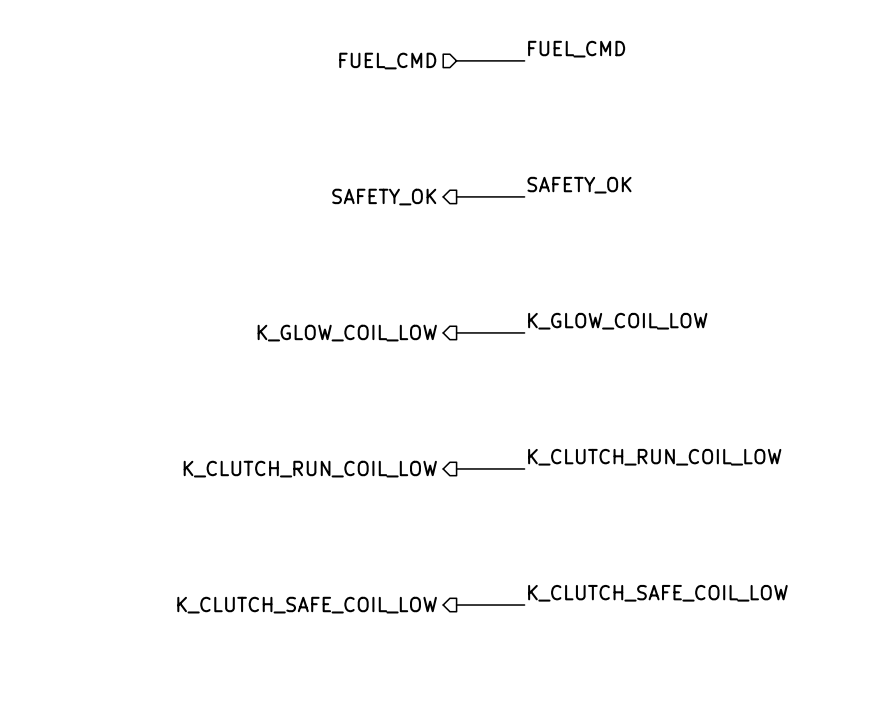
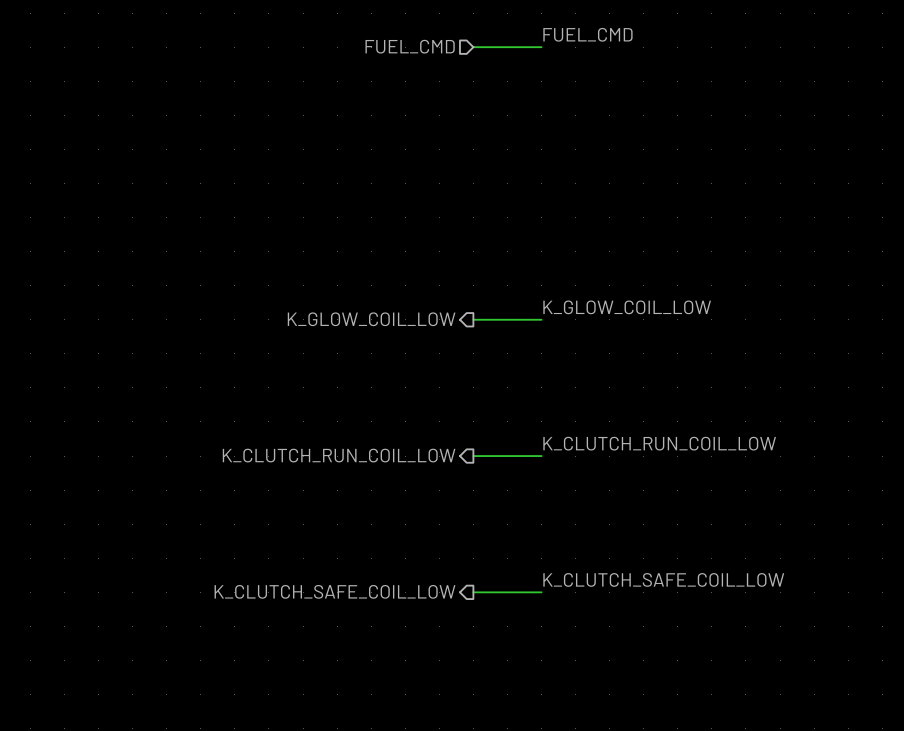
label: SAFETY_OK (579, 185) -> none
wire: (456, 196) (524, 196) -> none
hierarchical label: SAFETY_OK (384, 197) -> none

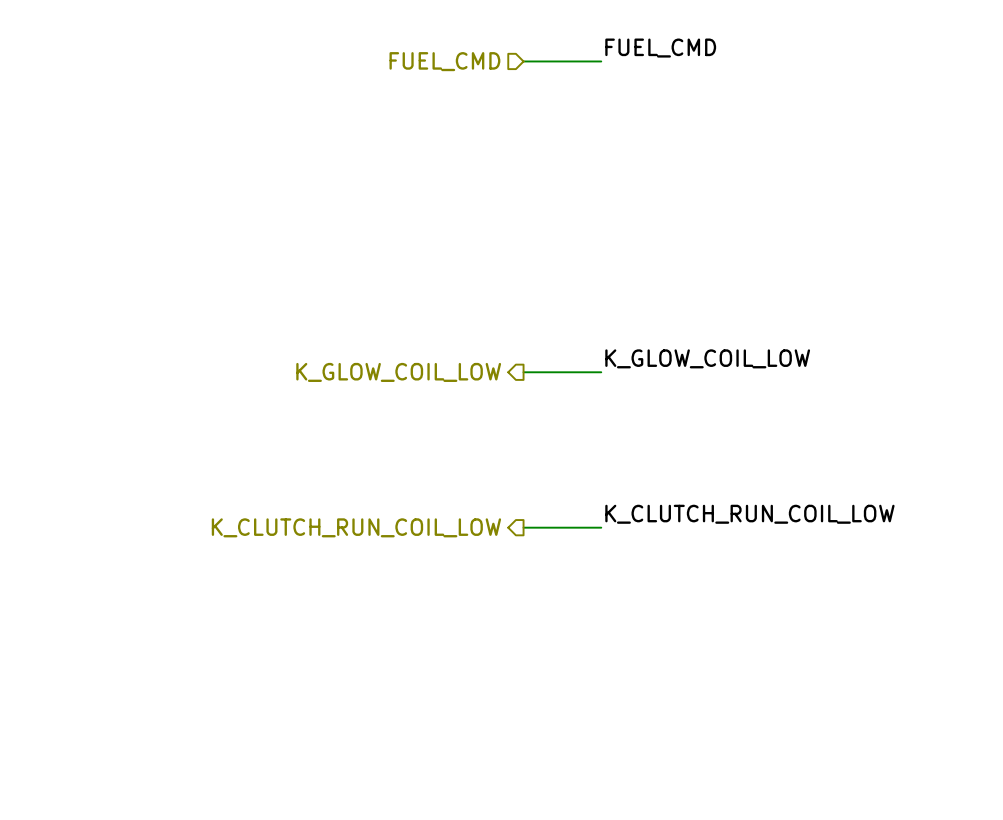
label: K_CLUTCH_SAFE_COIL_LOW (663, 579) -> none
hierarchical label: K_CLUTCH_SAFE_COIL_LOW (334, 591) -> none
wire: (473, 592) (541, 592) -> none

